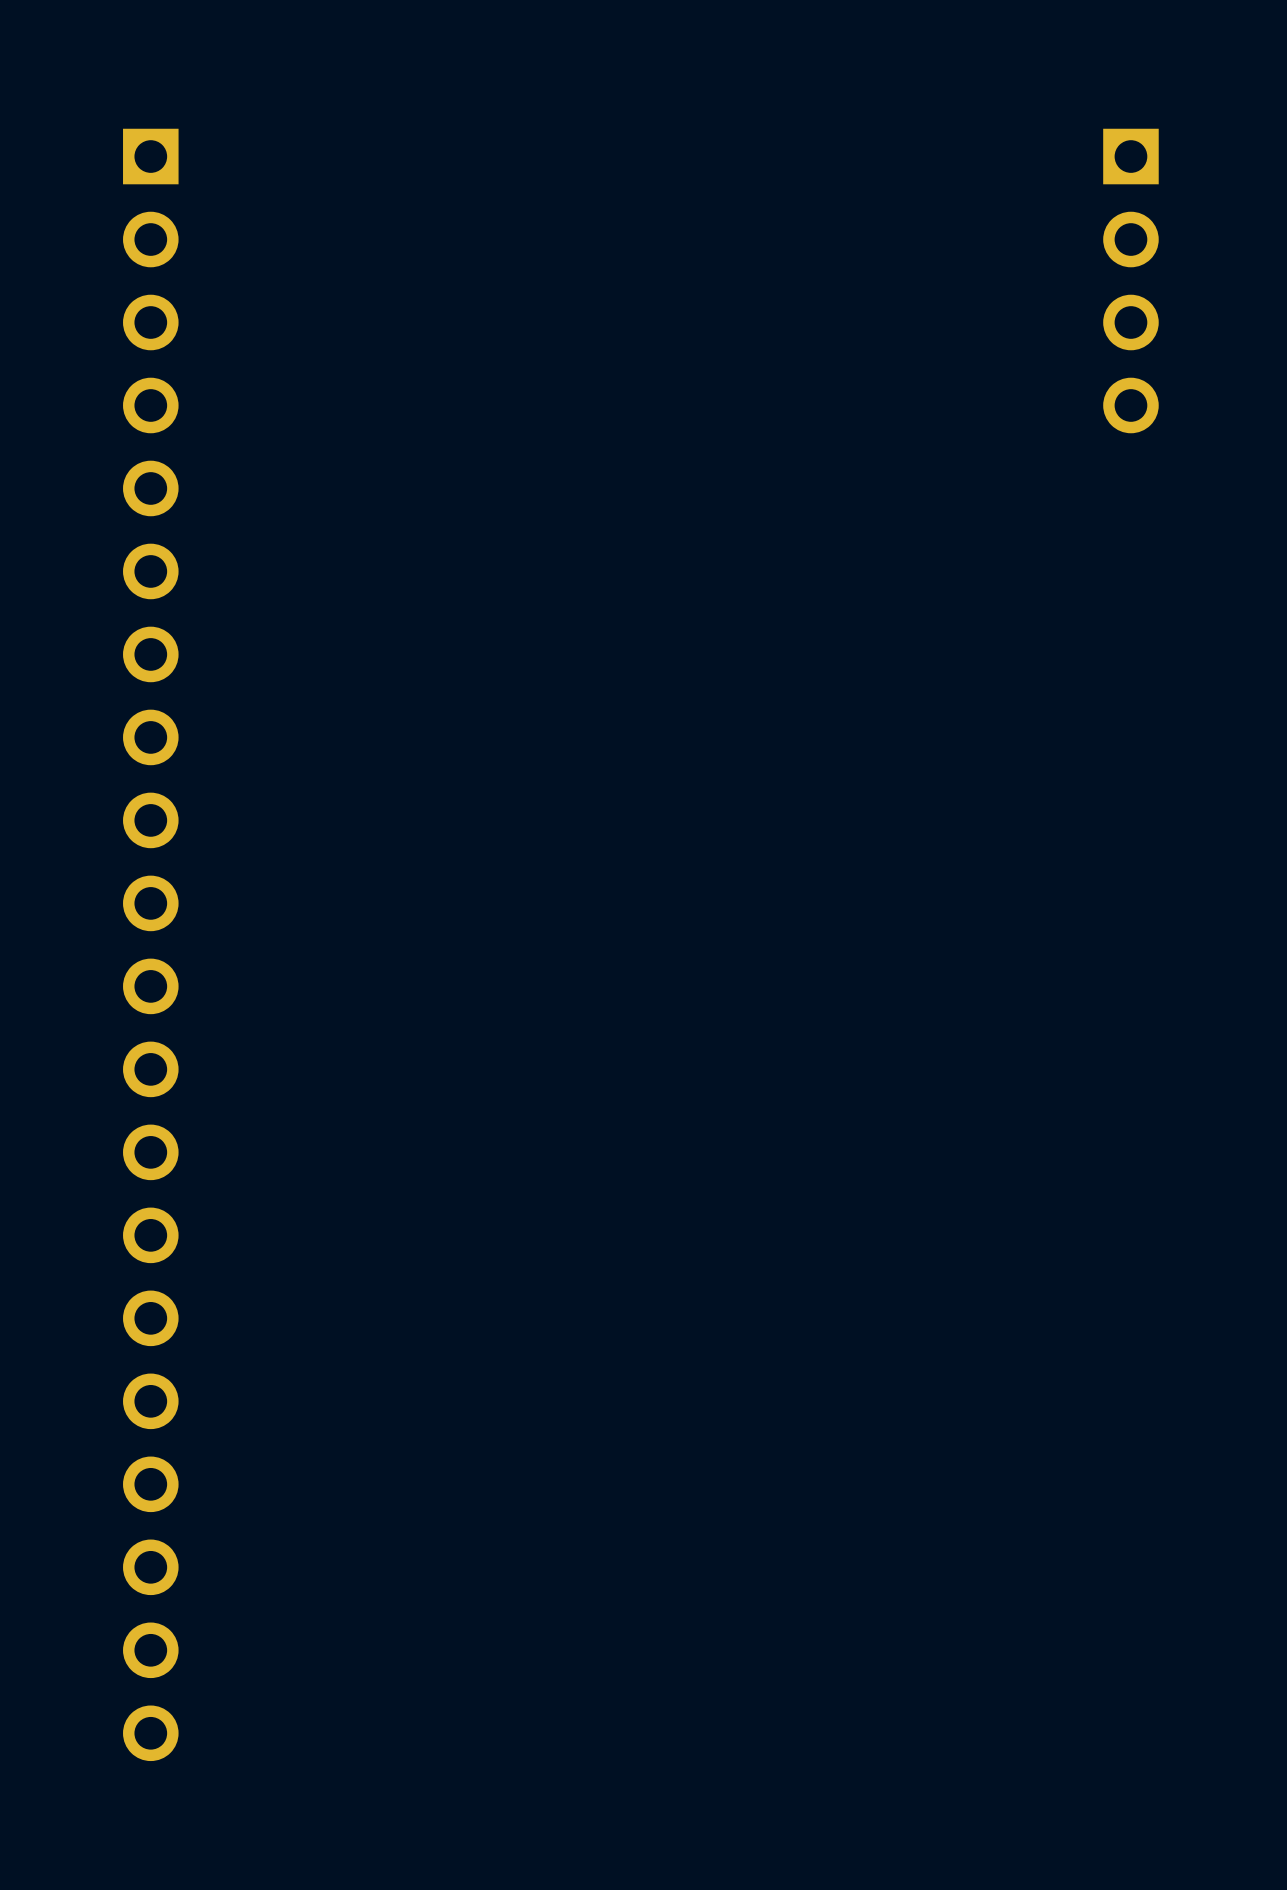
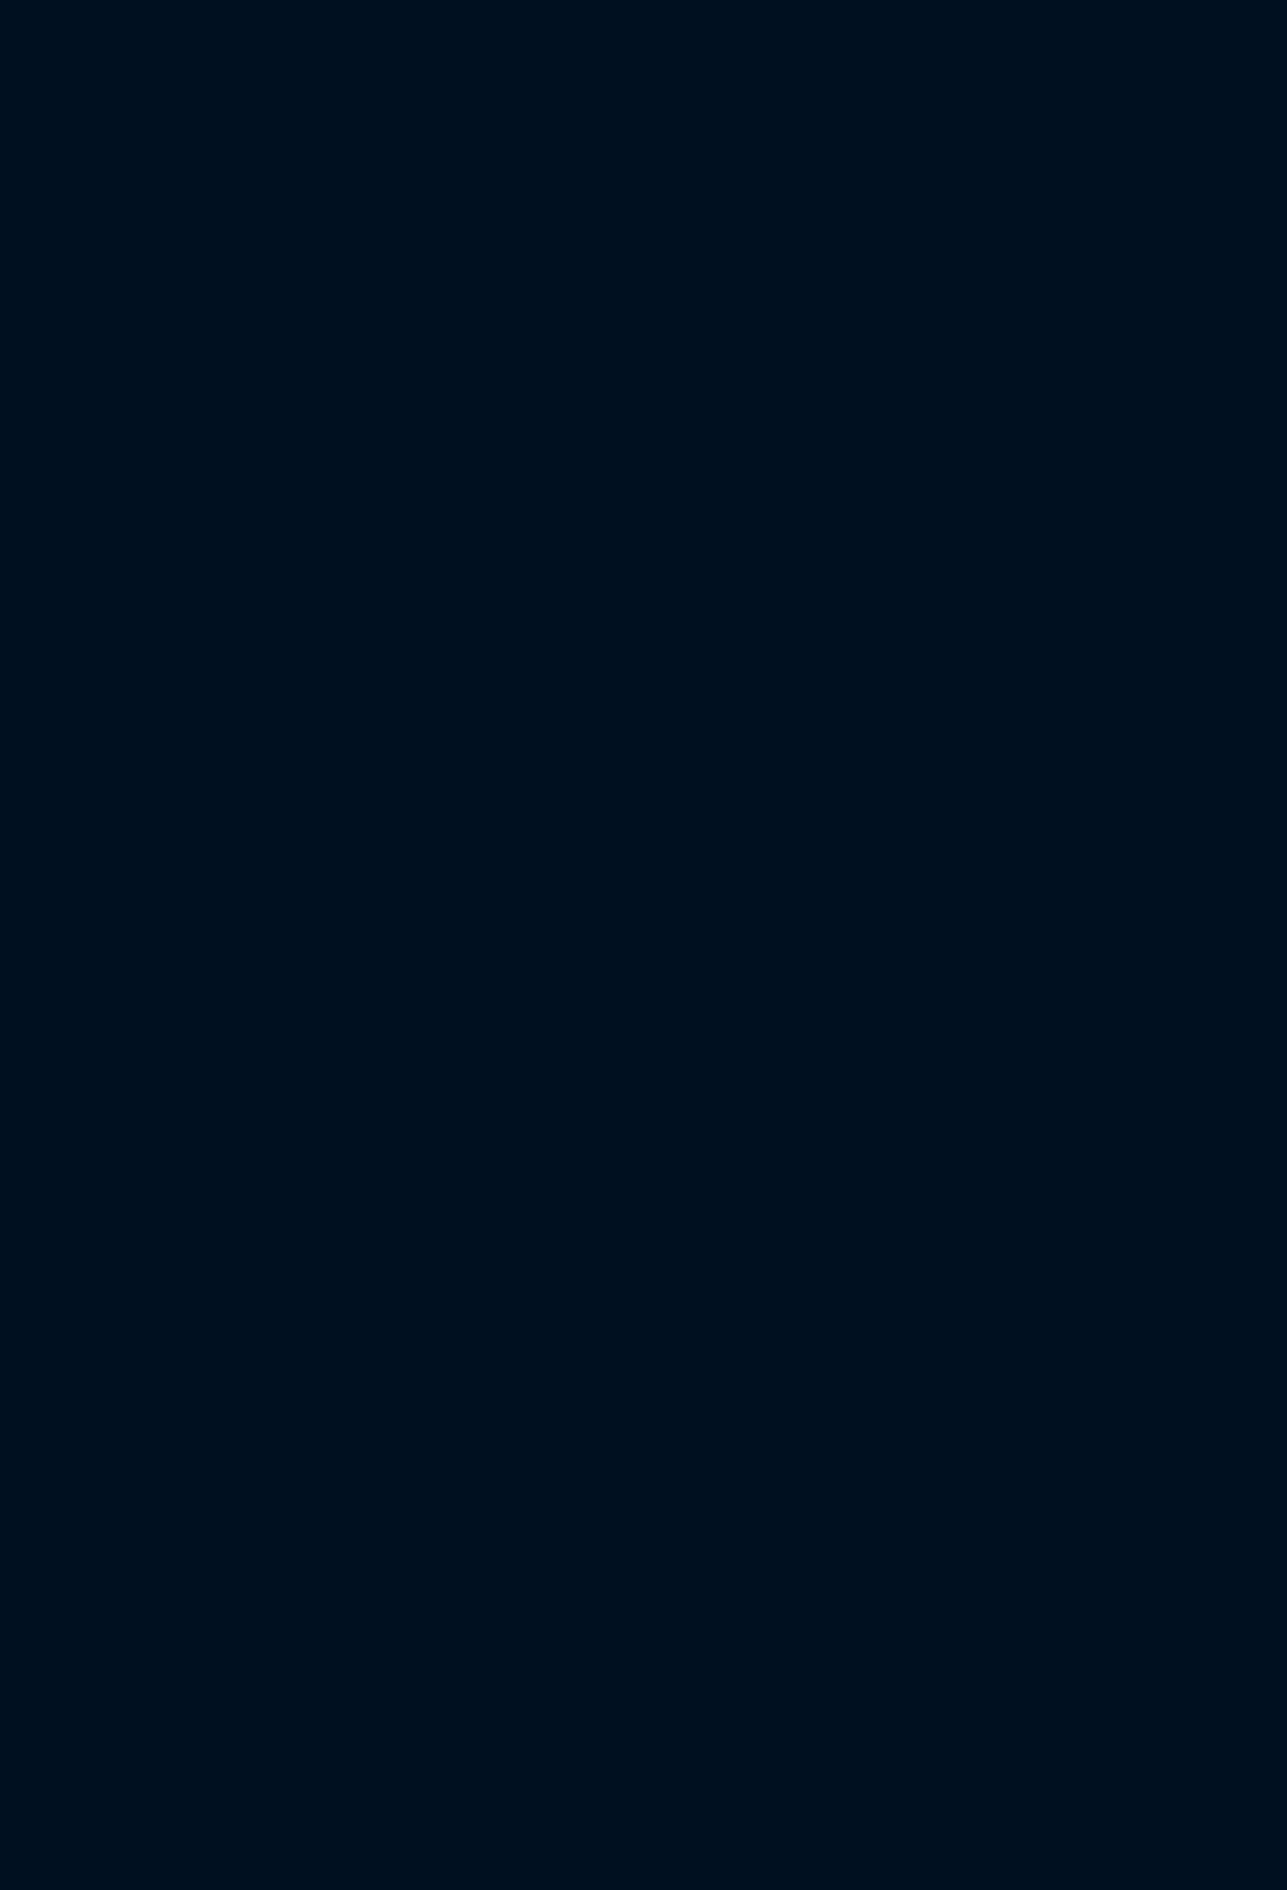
part: (1130, 281) -> none
part: (150, 944) -> none

